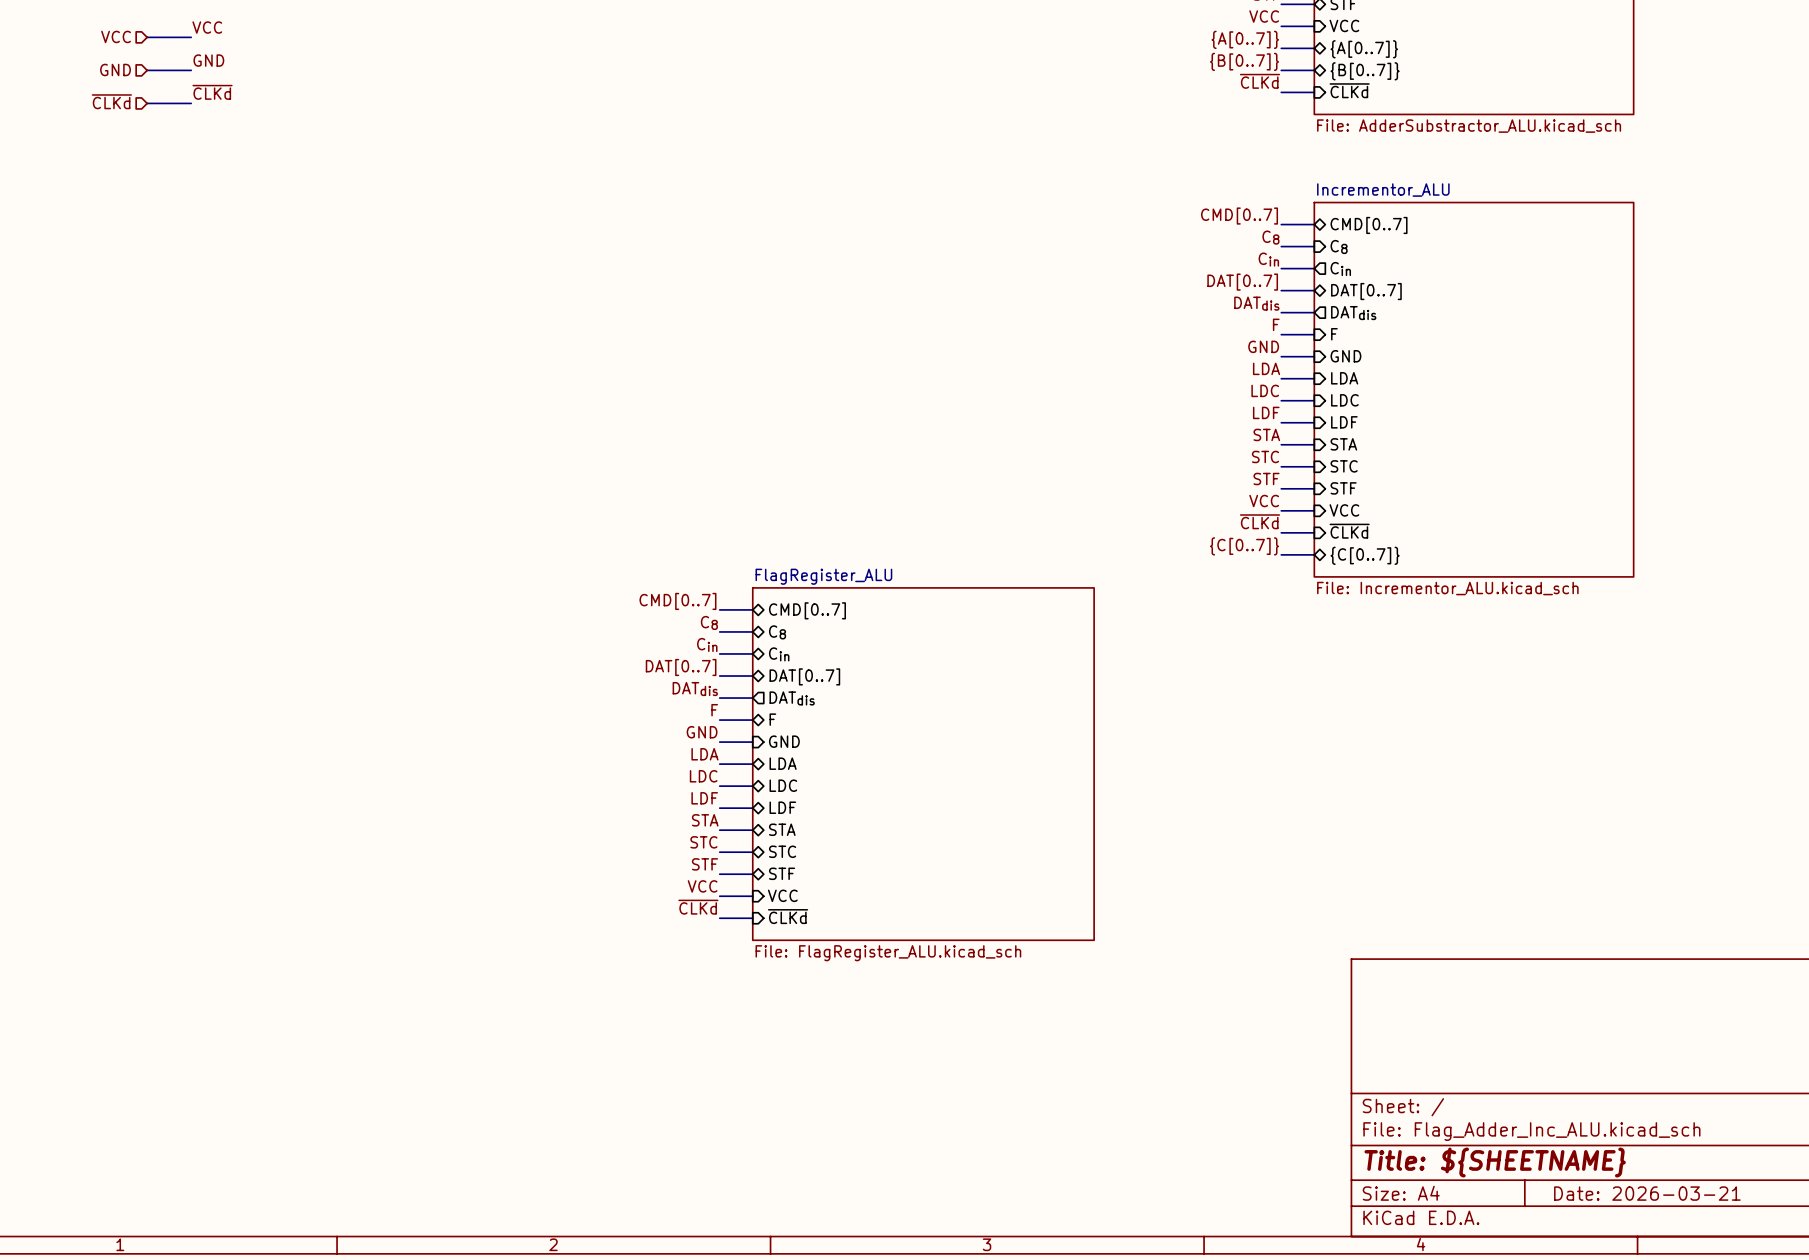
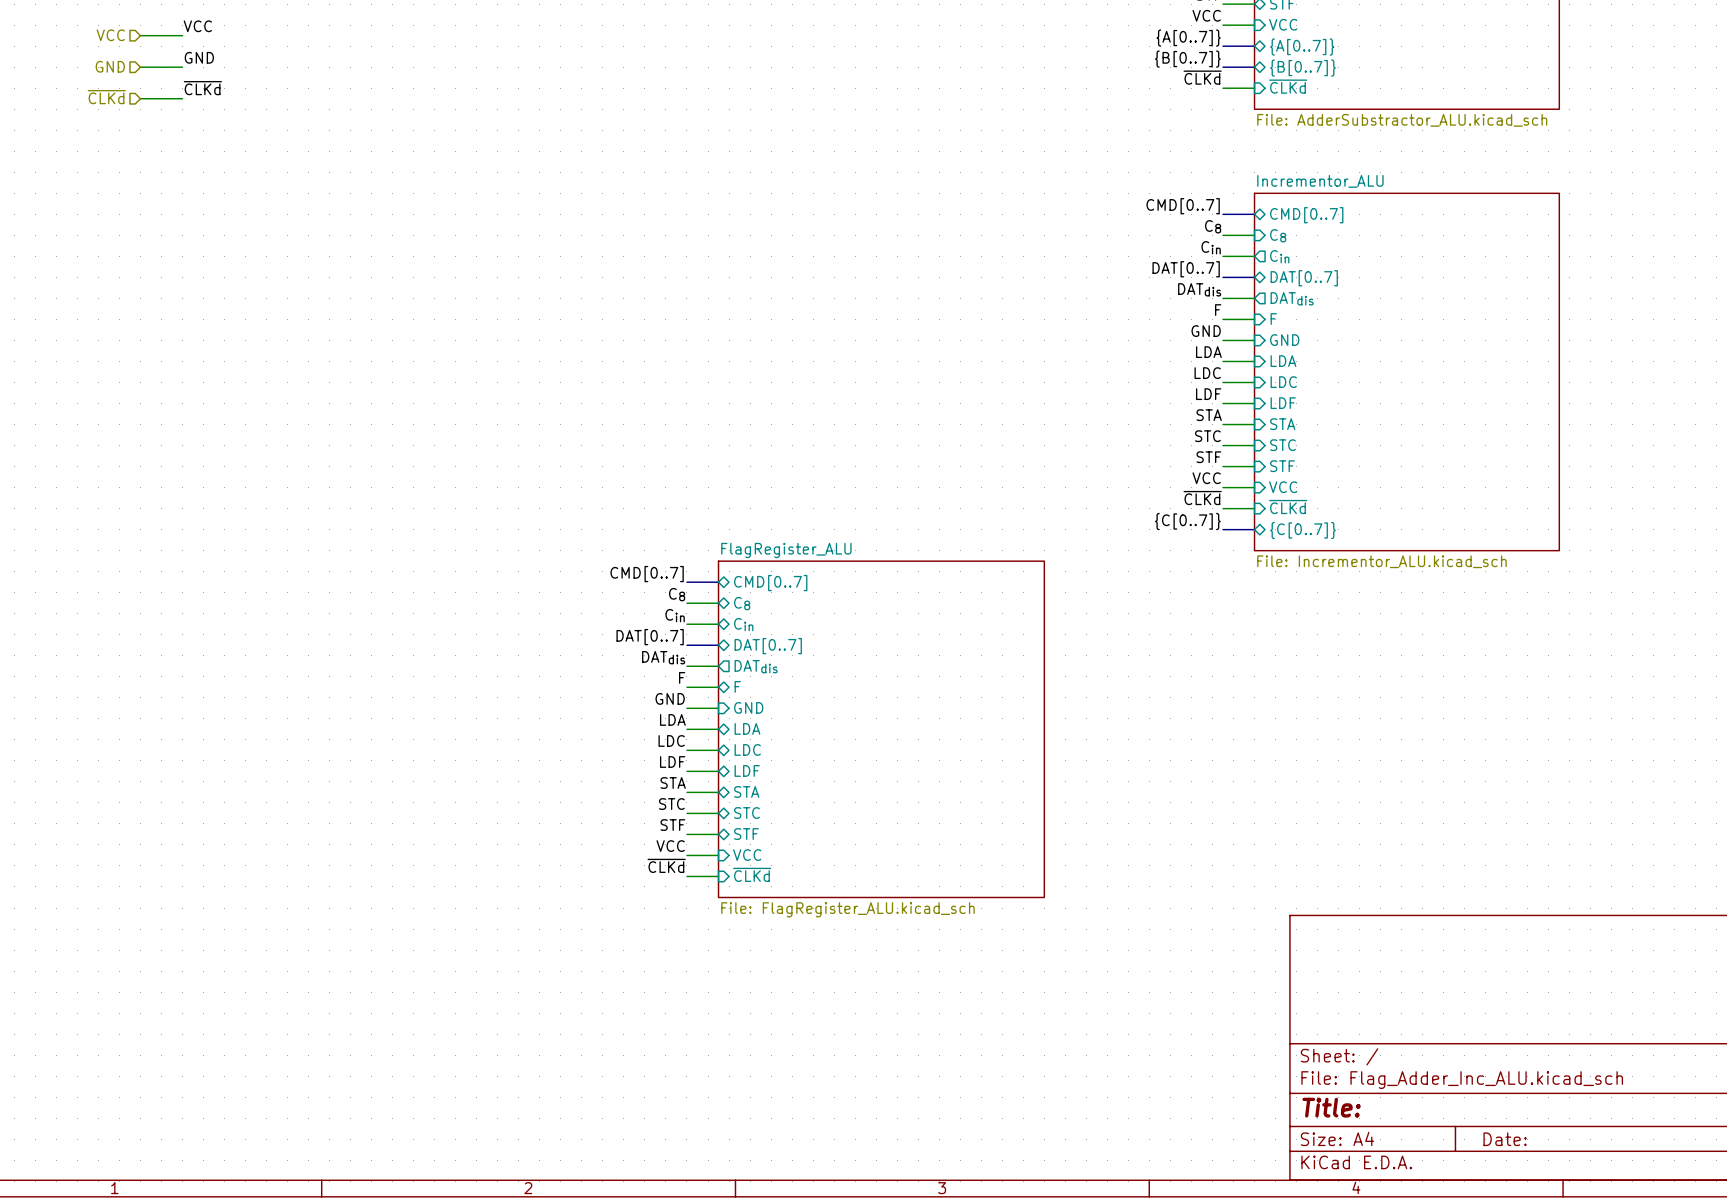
title block: Title: ${SHEETNAME} (1495, 1162) -> Title: (1331, 1107)
title block: Date: 2026-03-21 (1647, 1193) -> Date: (1505, 1139)

